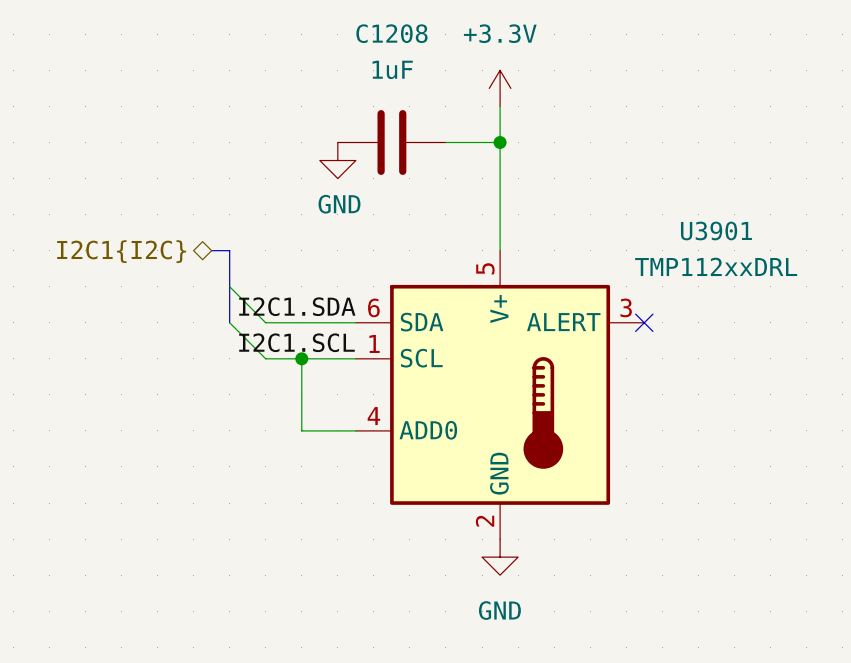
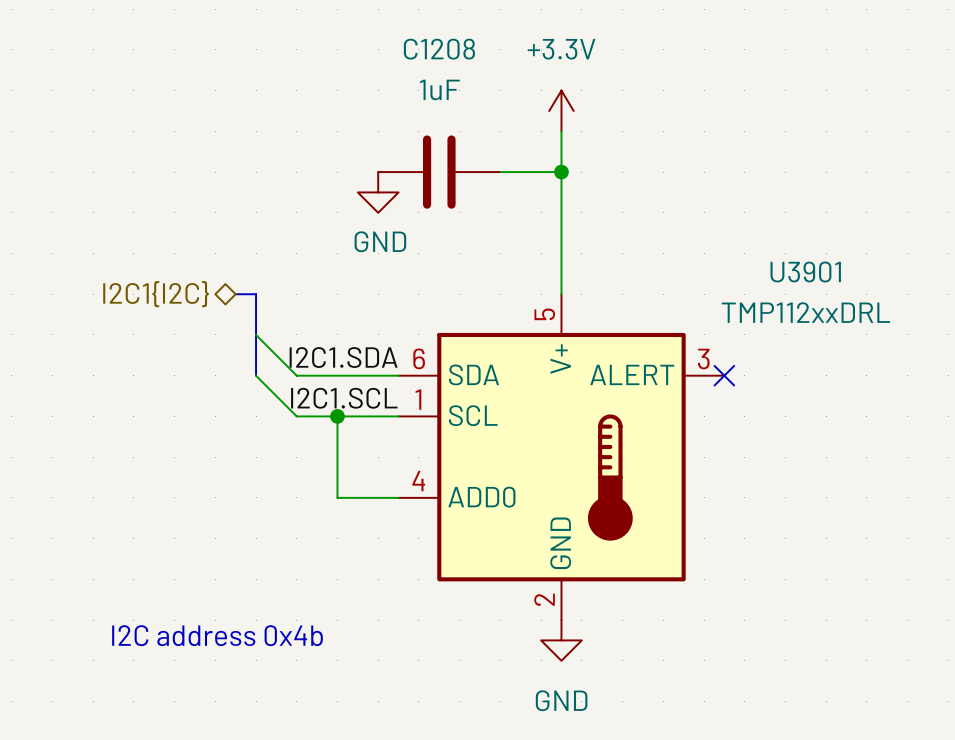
text: none -> I2C address 0x4b (217, 635)

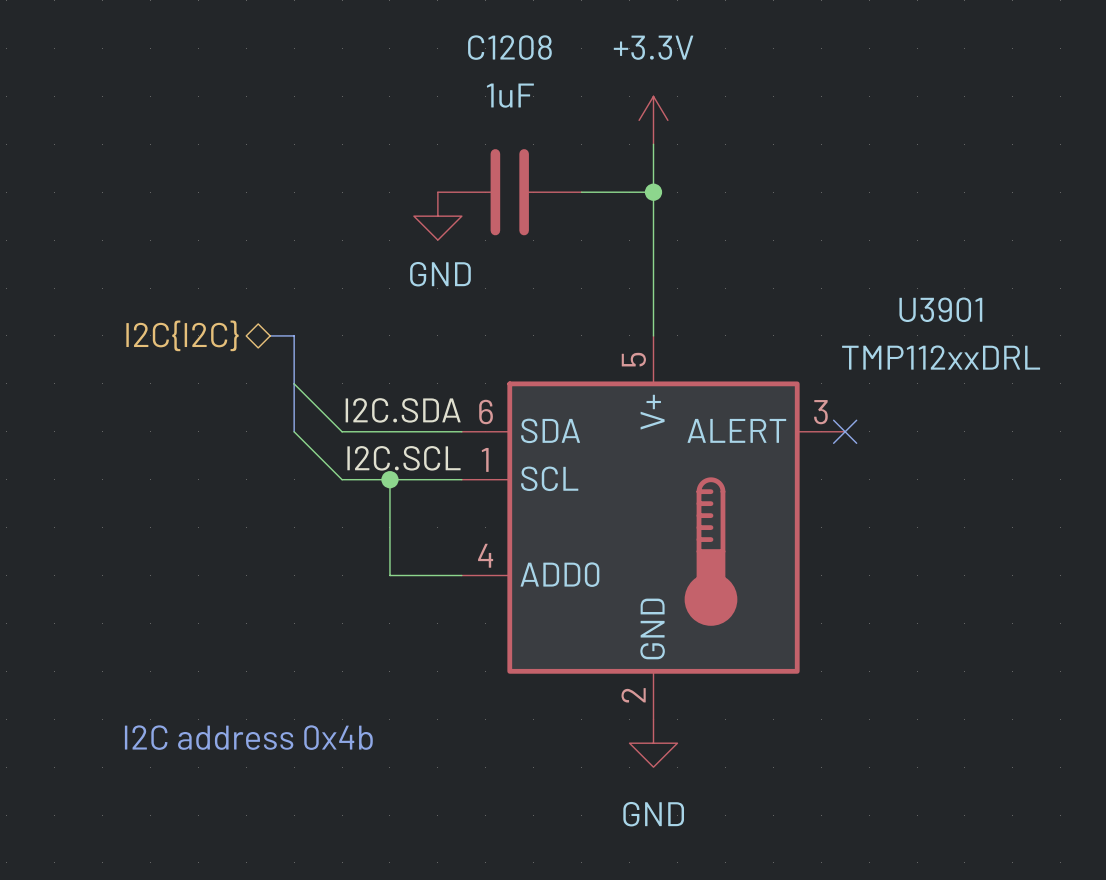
hierarchical label: I2C1{I2C} (156, 294) -> I2C{I2C} (182, 335)
label: I2C1.SDA (343, 357) -> I2C.SDA (403, 410)
label: I2C1.SCL (344, 398) -> I2C.SCL (403, 458)

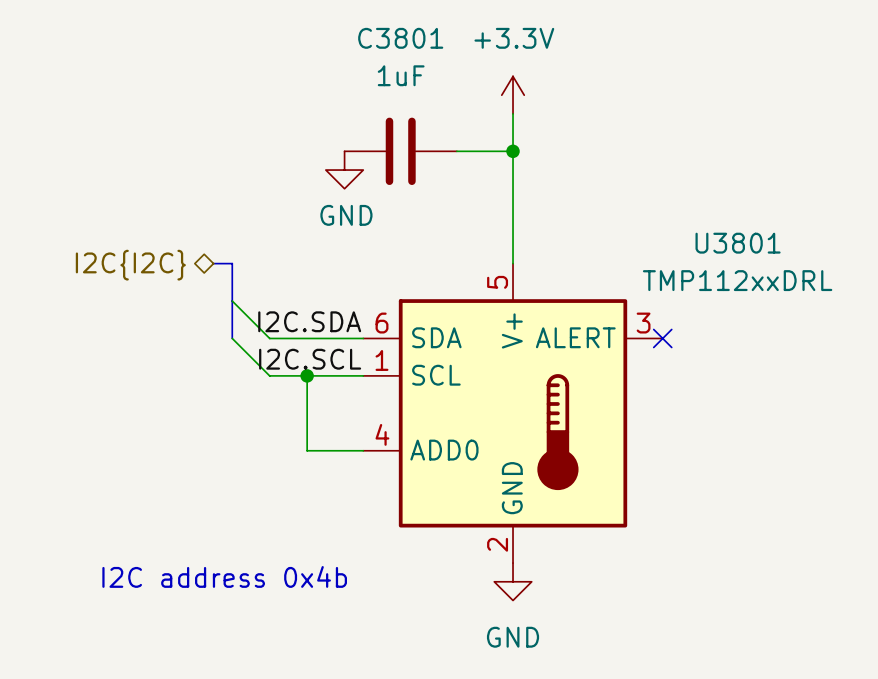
C1208 name: C1208 (509, 47) -> C3801 (400, 38)
U3901 name: U3901 (940, 309) -> U3801 (738, 243)

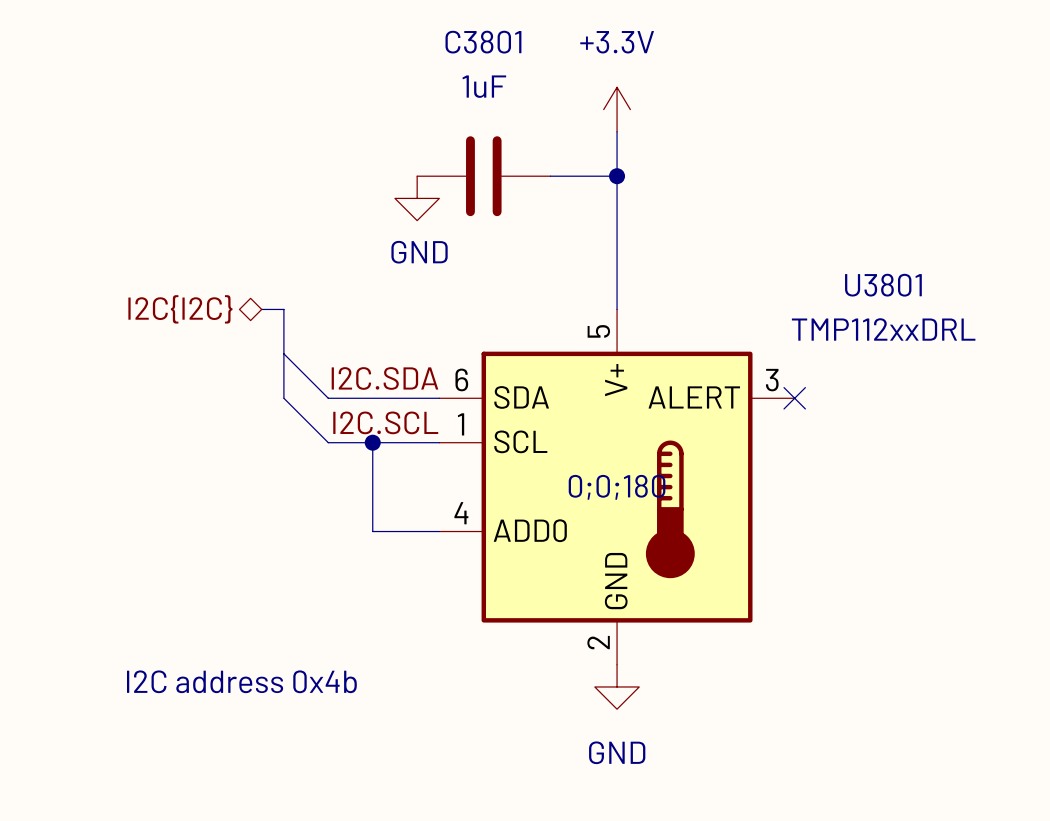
U3801 text: none -> 0;0;180 (617, 487)

